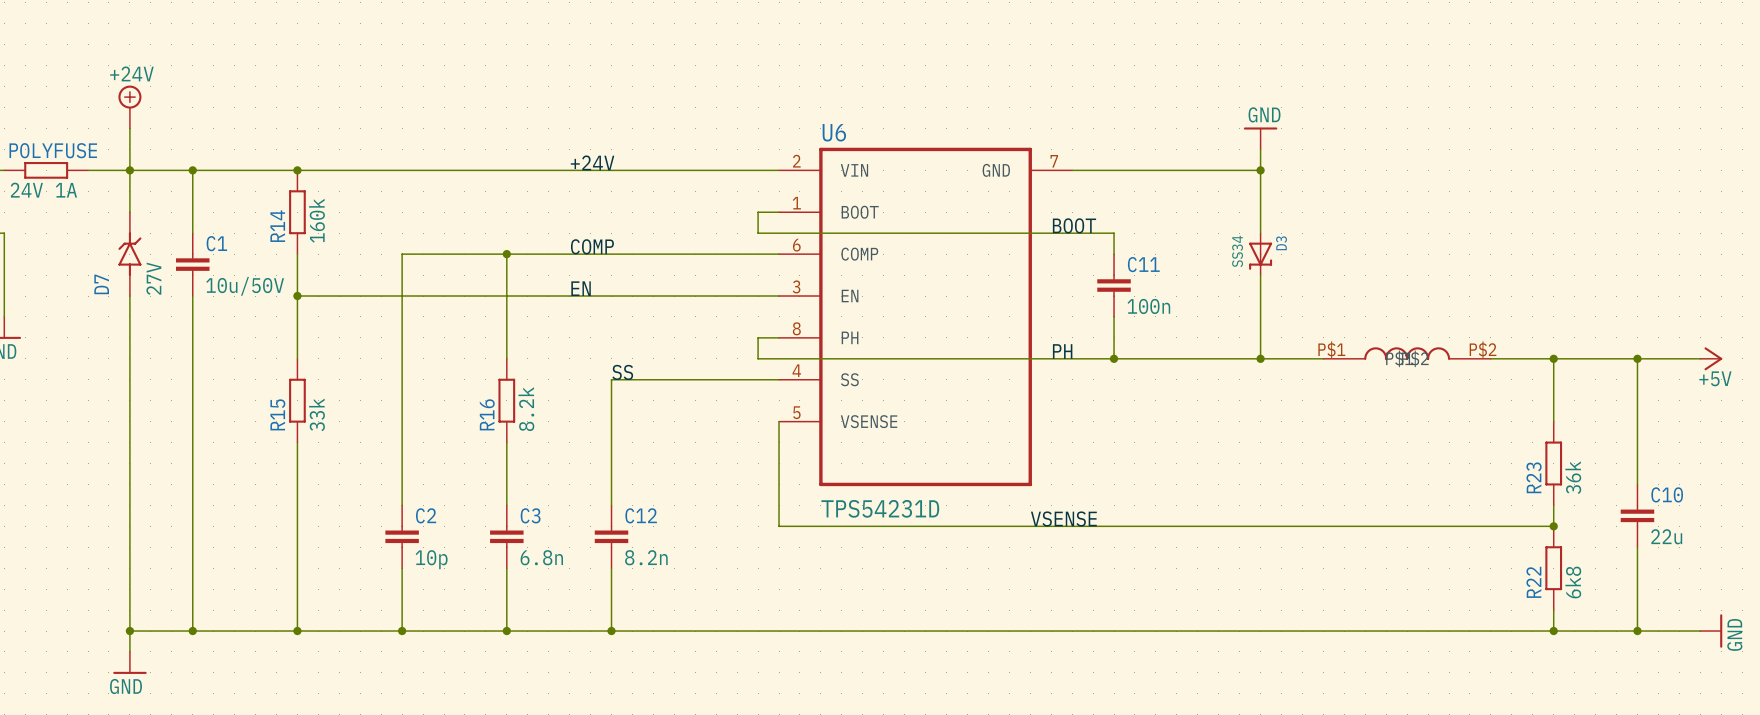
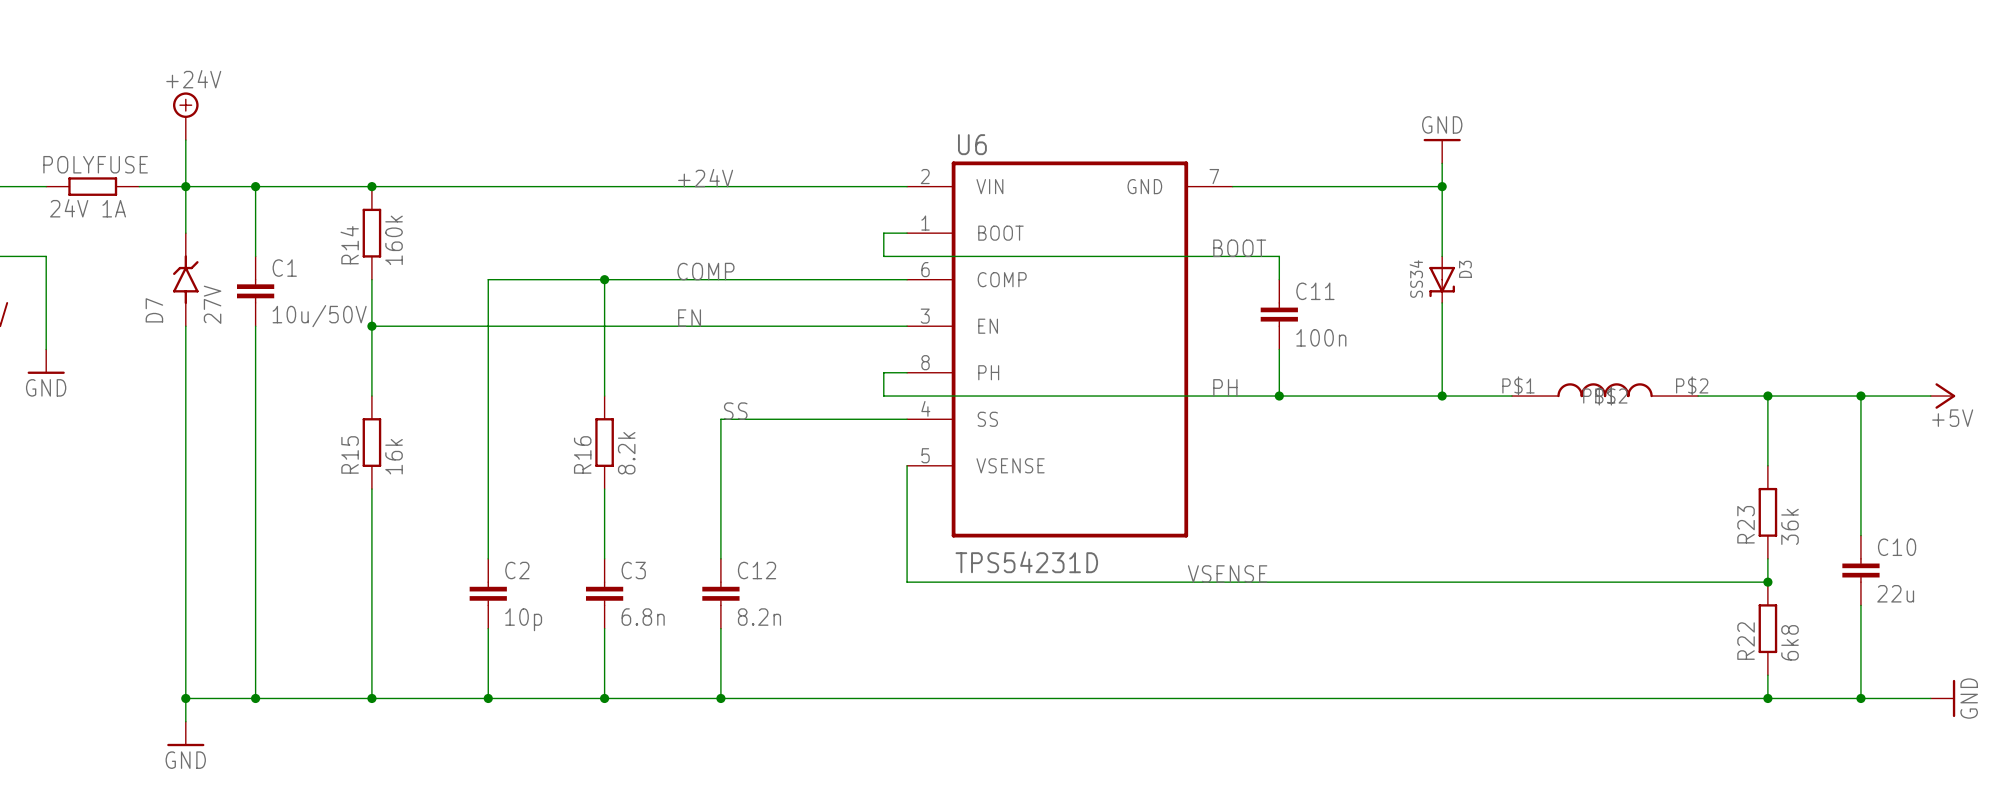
R15 value: 33k (317, 414) -> 16k (394, 456)

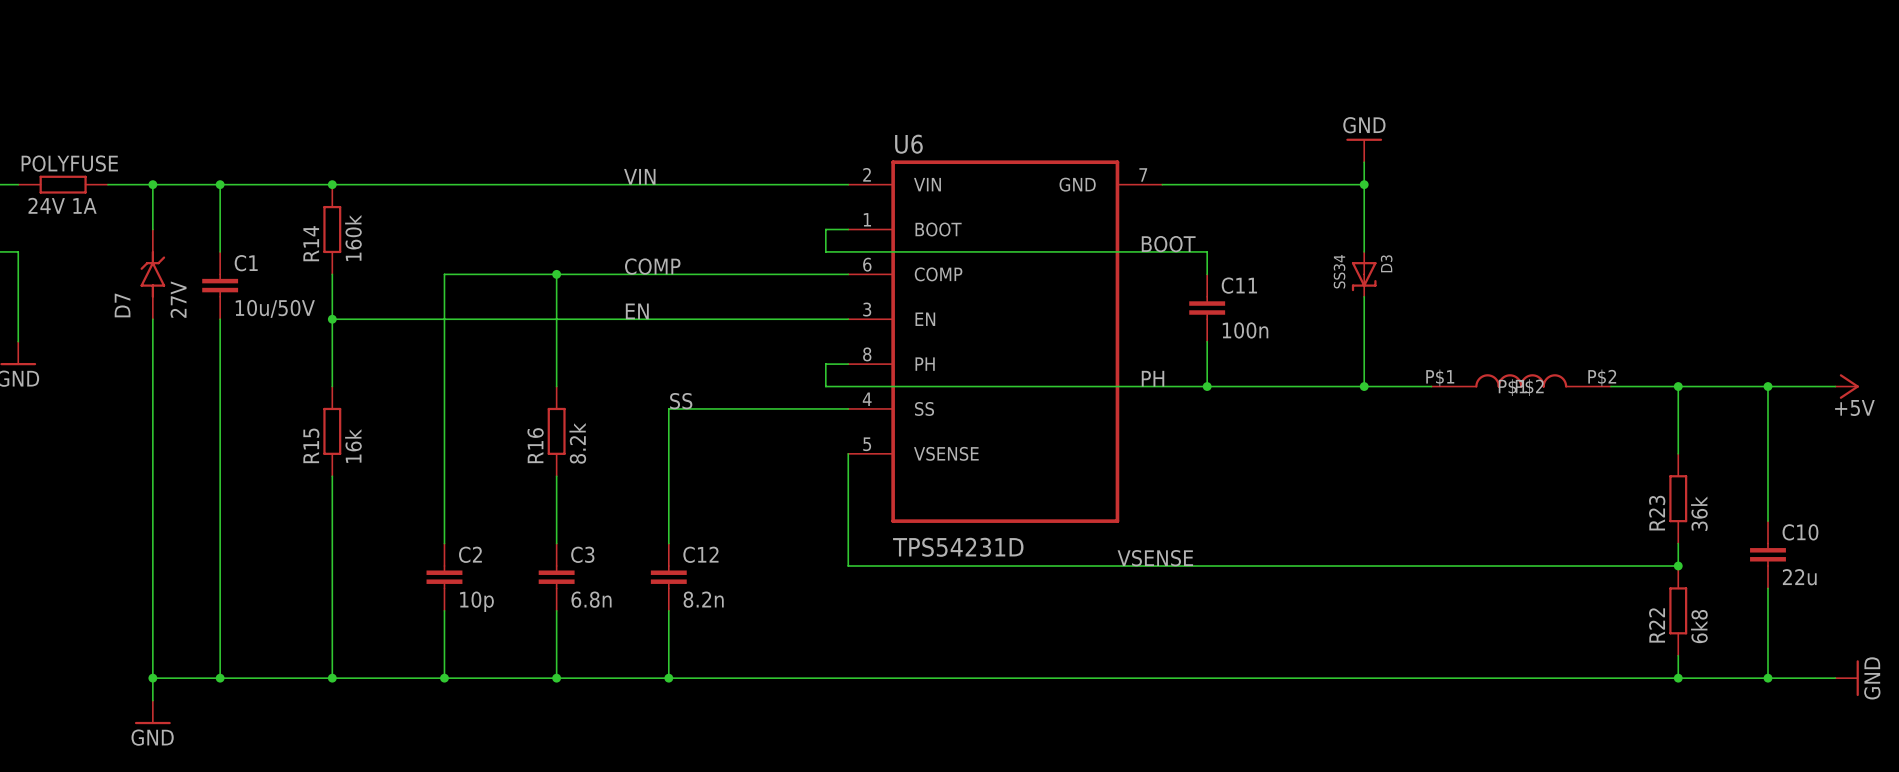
power symbol: +24V (185, 116) -> none
wire: (185, 140) (185, 186) -> none
label: +24V (705, 178) -> VIN (639, 176)

